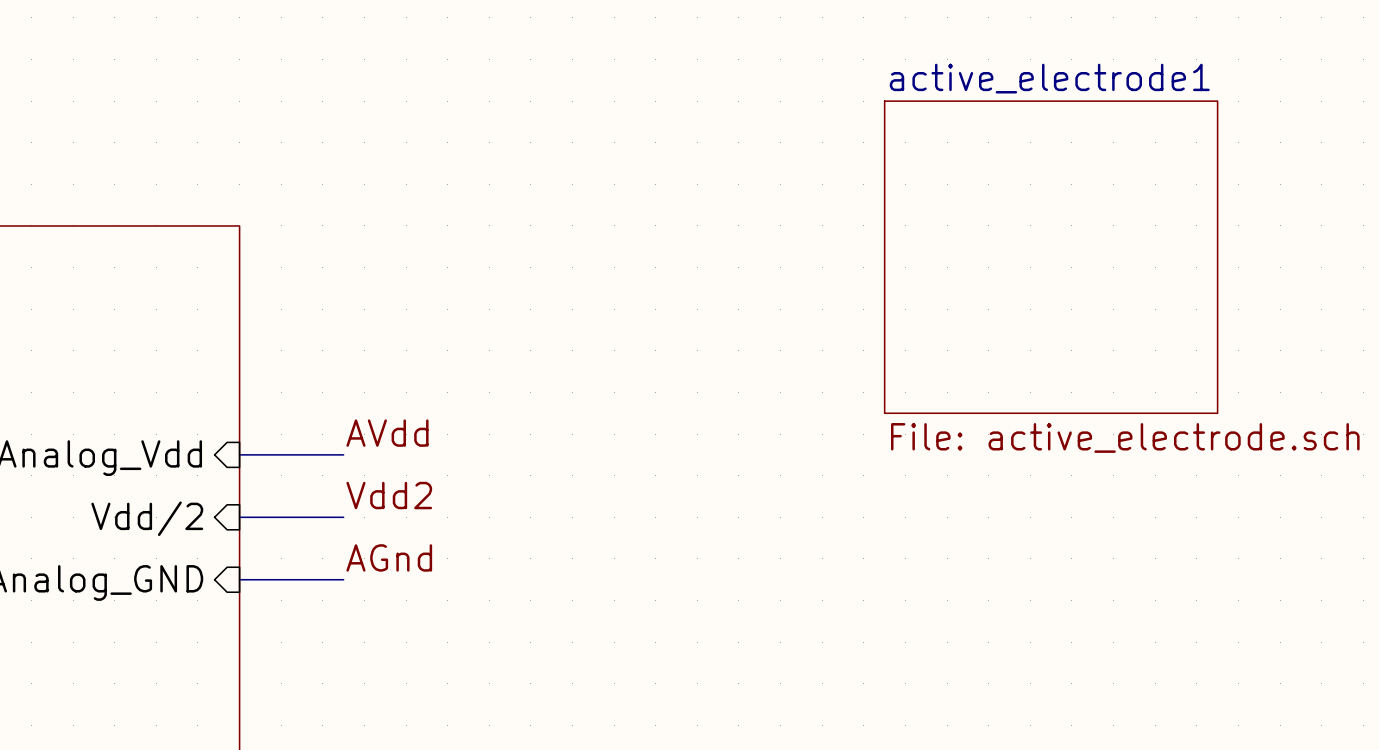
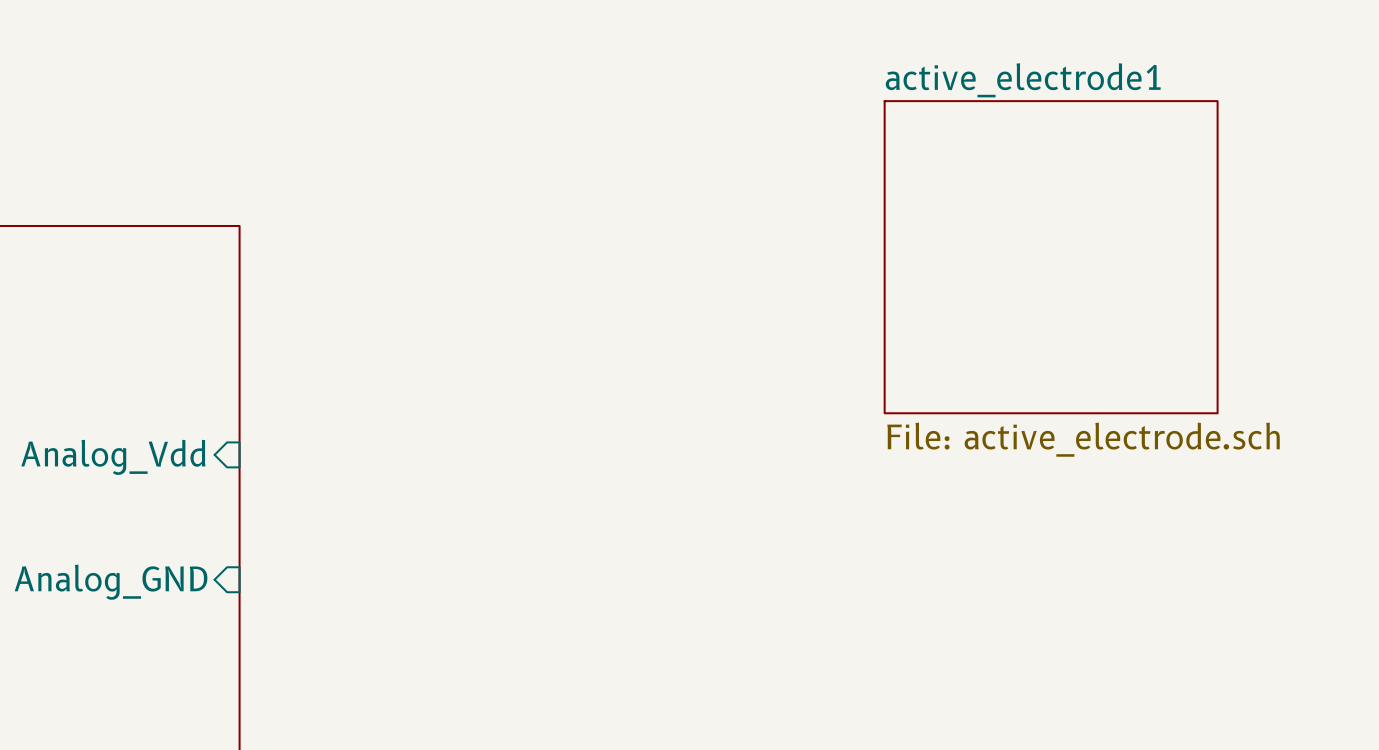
label: AVdd (387, 433) -> none
wire: (239, 454) (343, 454) -> none
label: Vdd2 (389, 495) -> none
wire: (239, 517) (343, 517) -> none
sheet pin: Vdd/2 (147, 518) -> none
label: AGnd (389, 557) -> none
wire: (239, 579) (343, 579) -> none

